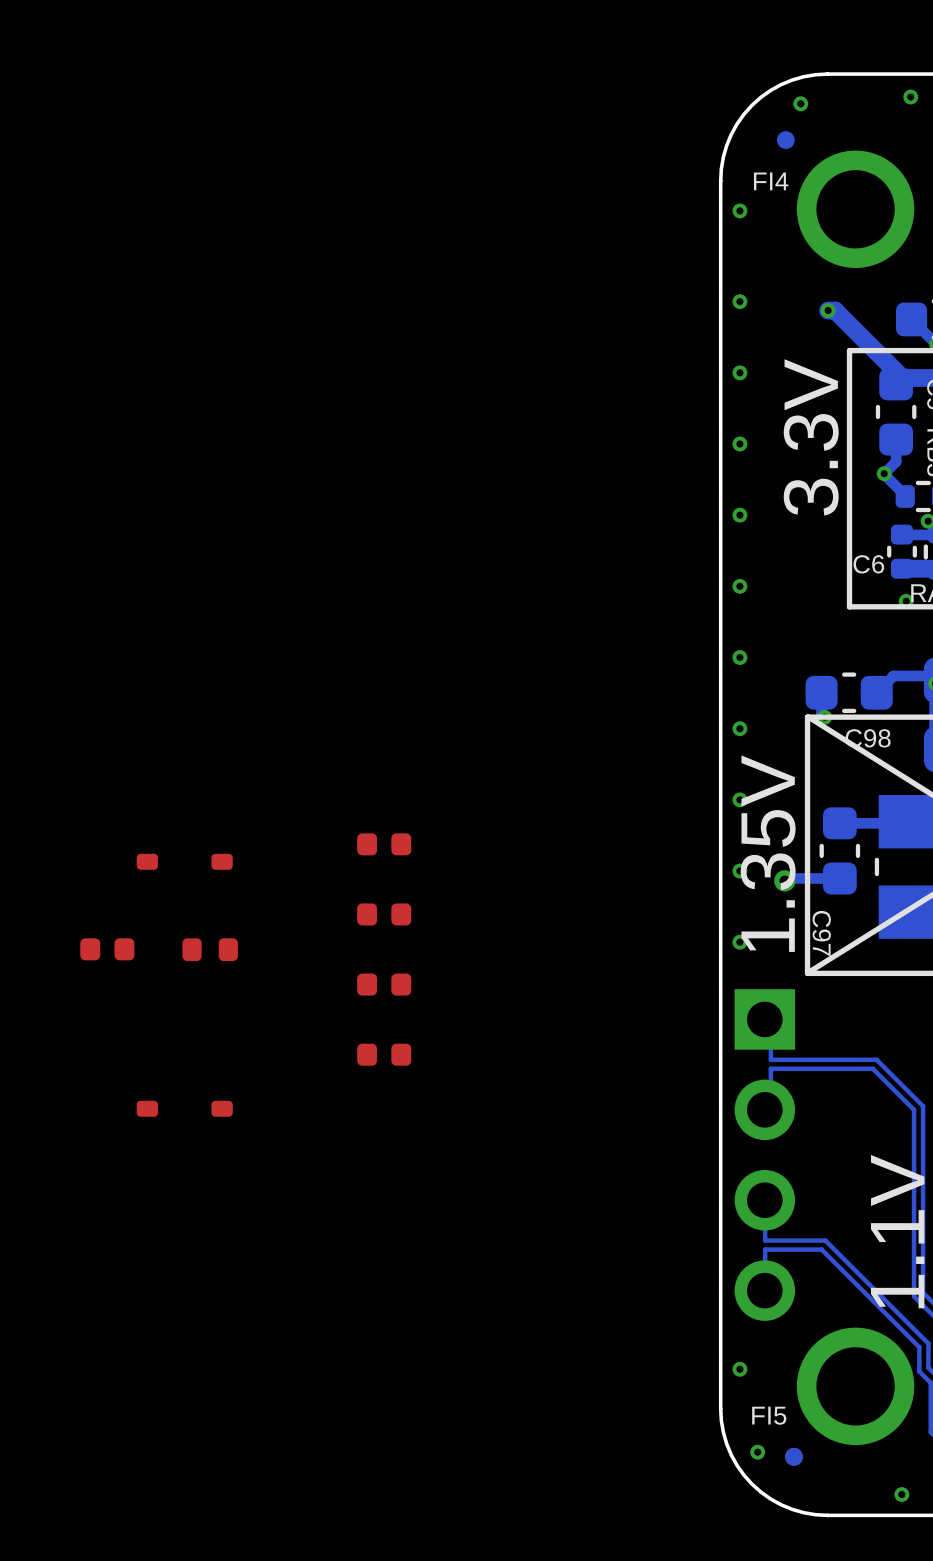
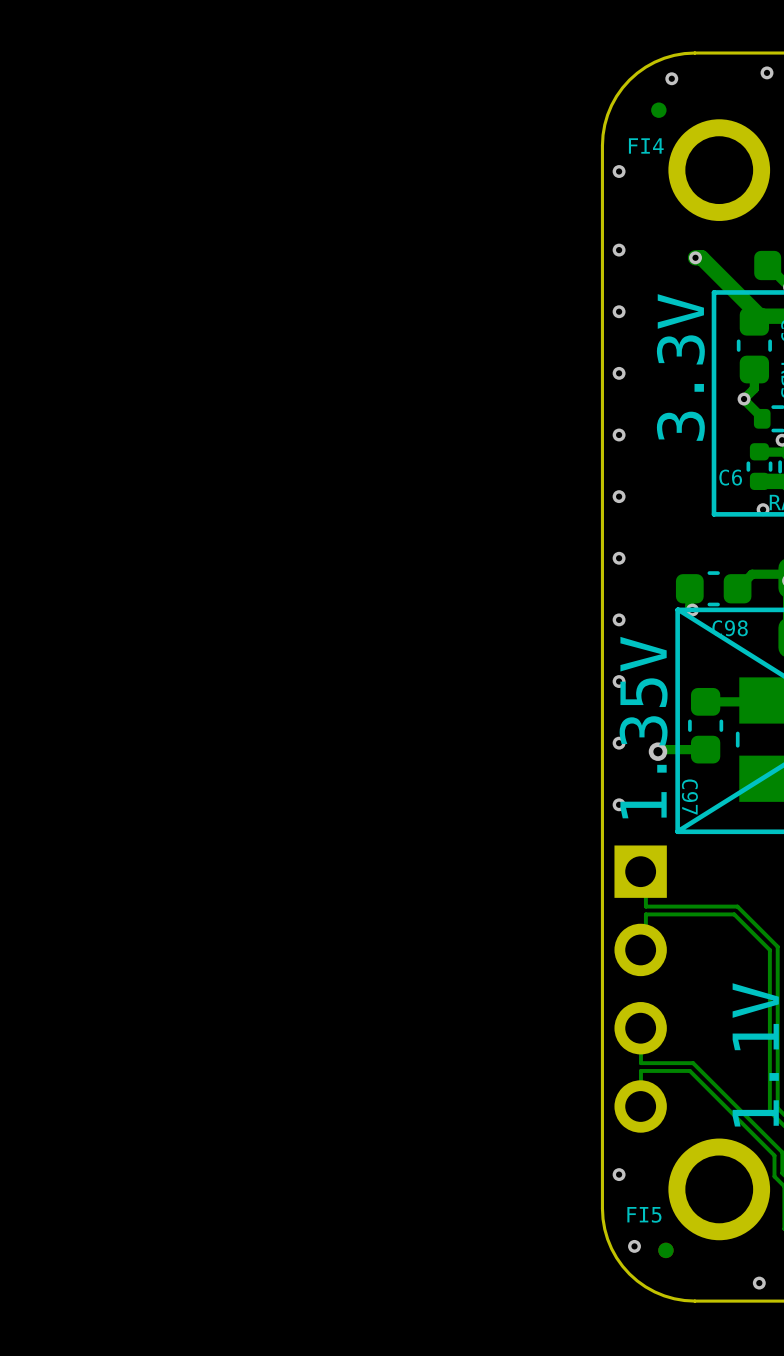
part: (384, 844) -> none
part: (184, 861) -> none
part: (384, 914) -> none
part: (107, 949) -> none
part: (210, 949) -> none
part: (384, 984) -> none
part: (384, 1054) -> none
part: (184, 1108) -> none

